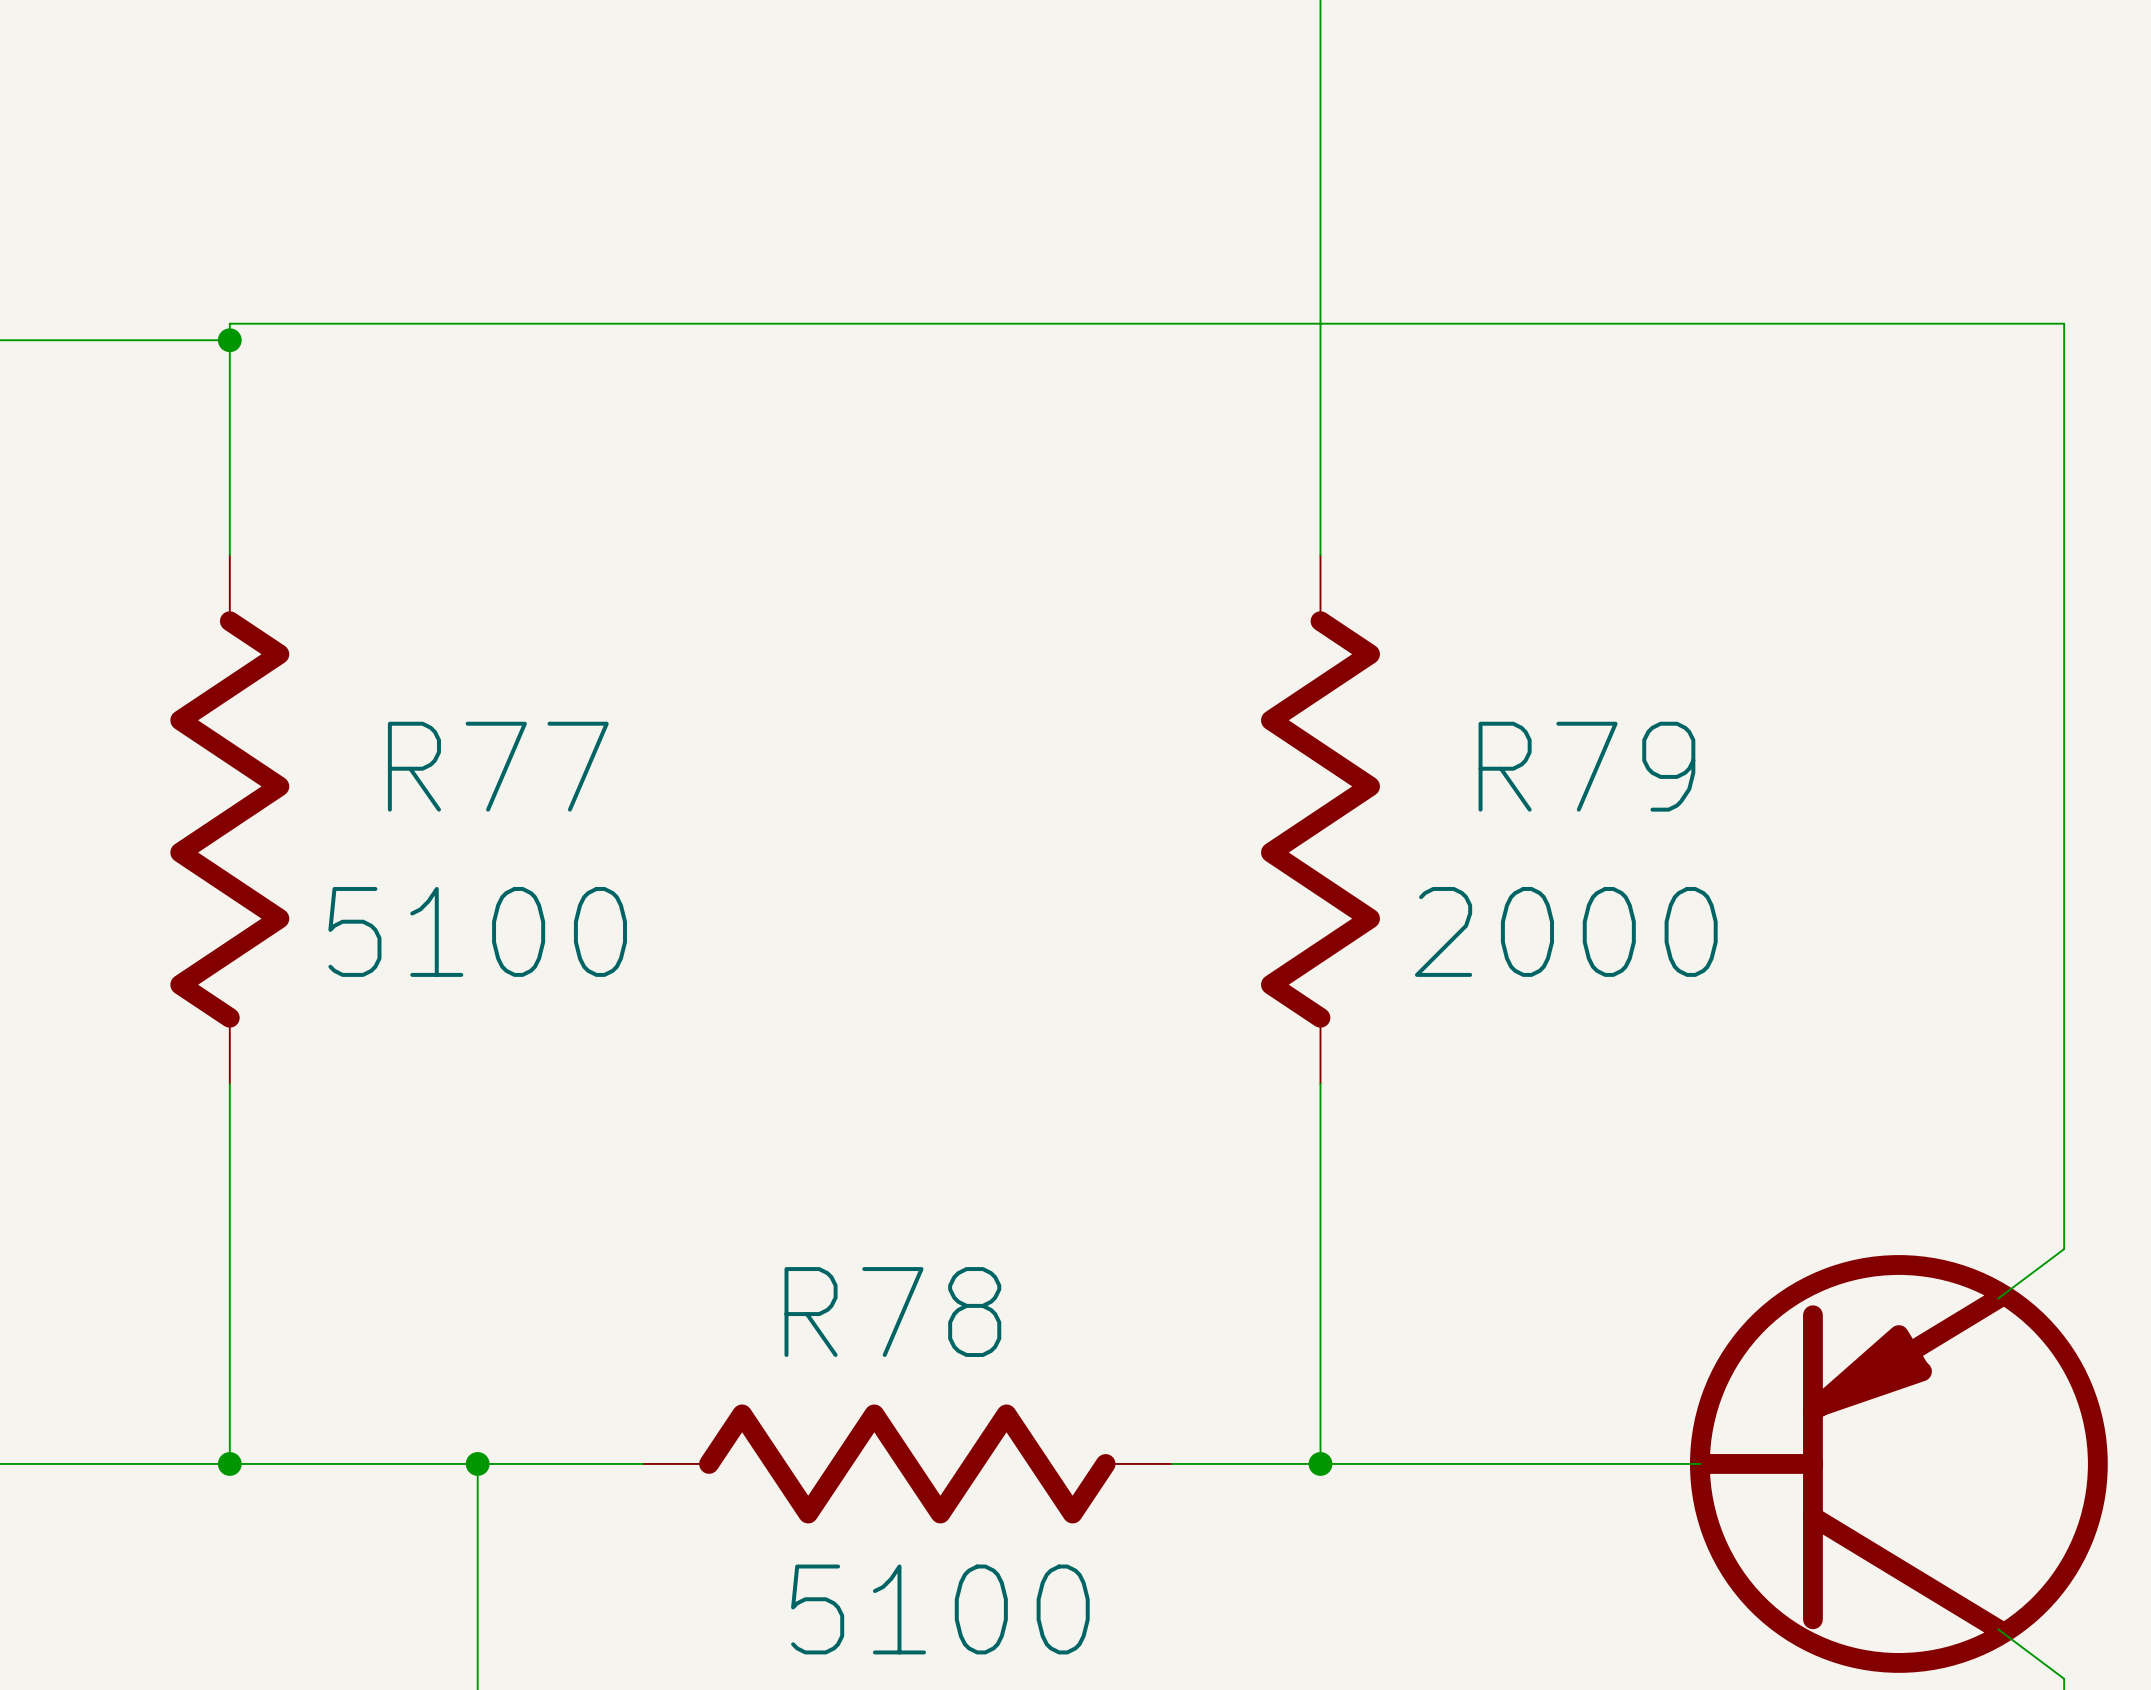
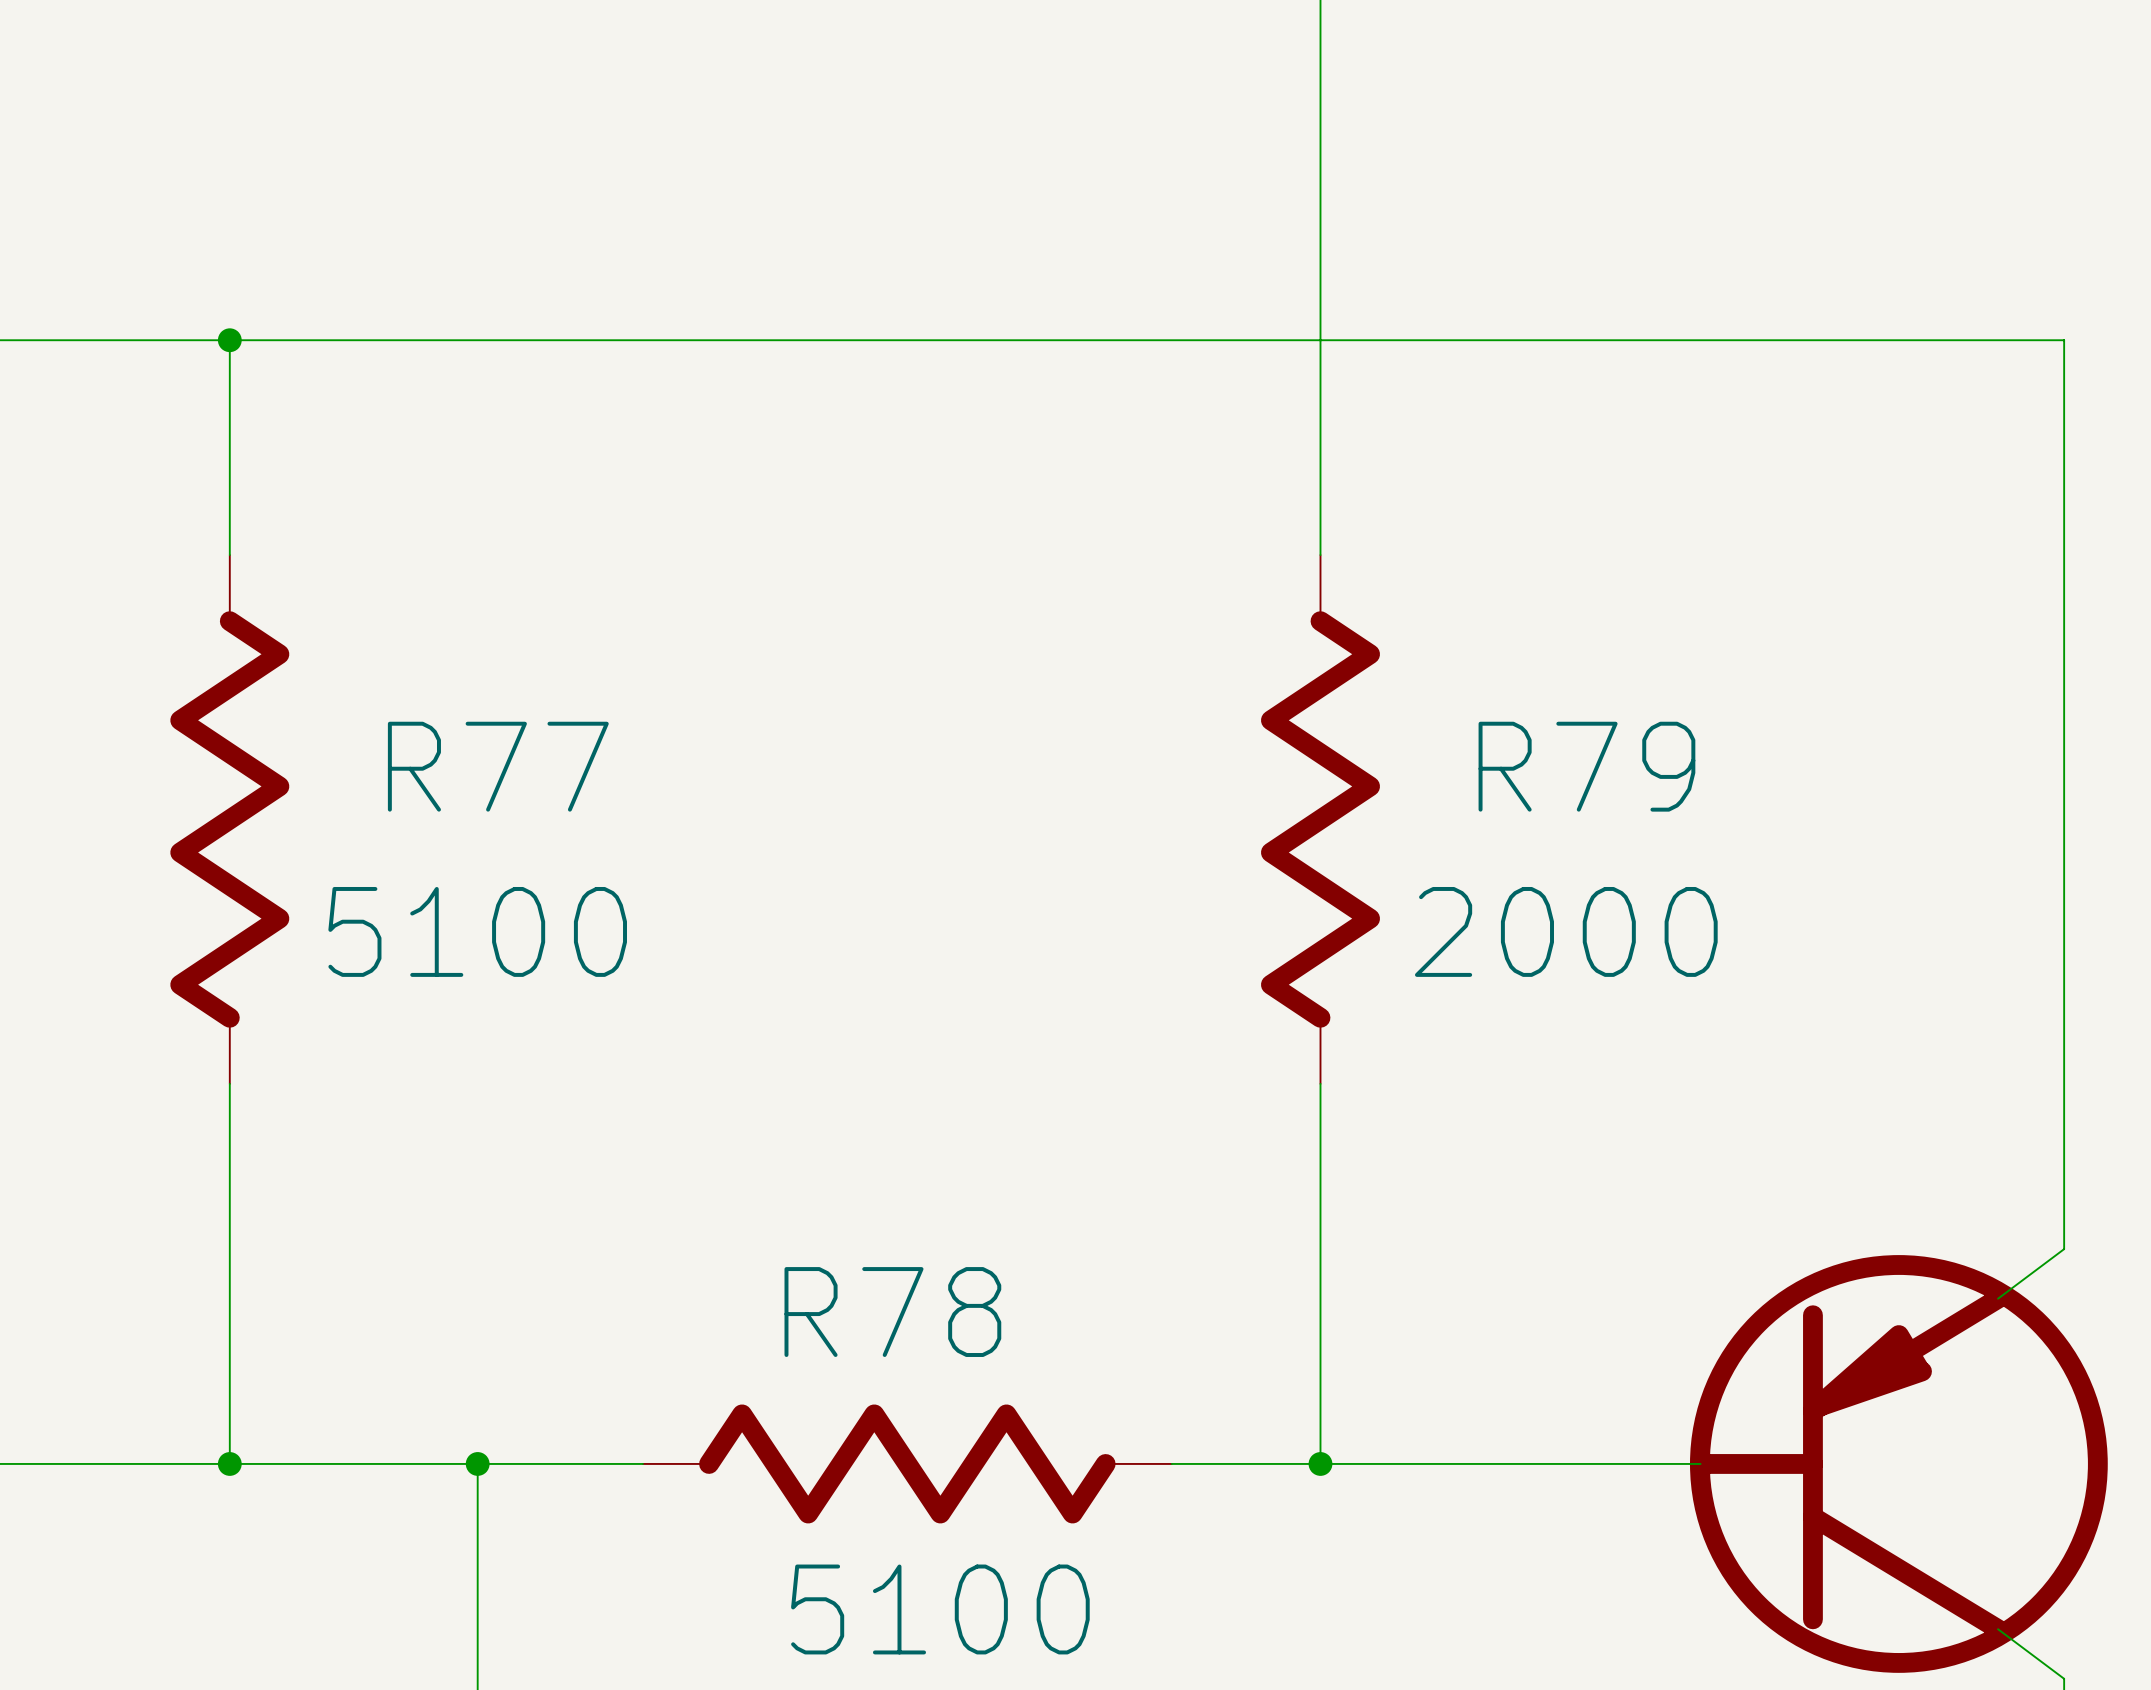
wire: (229, 340) (229, 323) (2064, 323) (2064, 340) -> (229, 340) (2064, 340)

